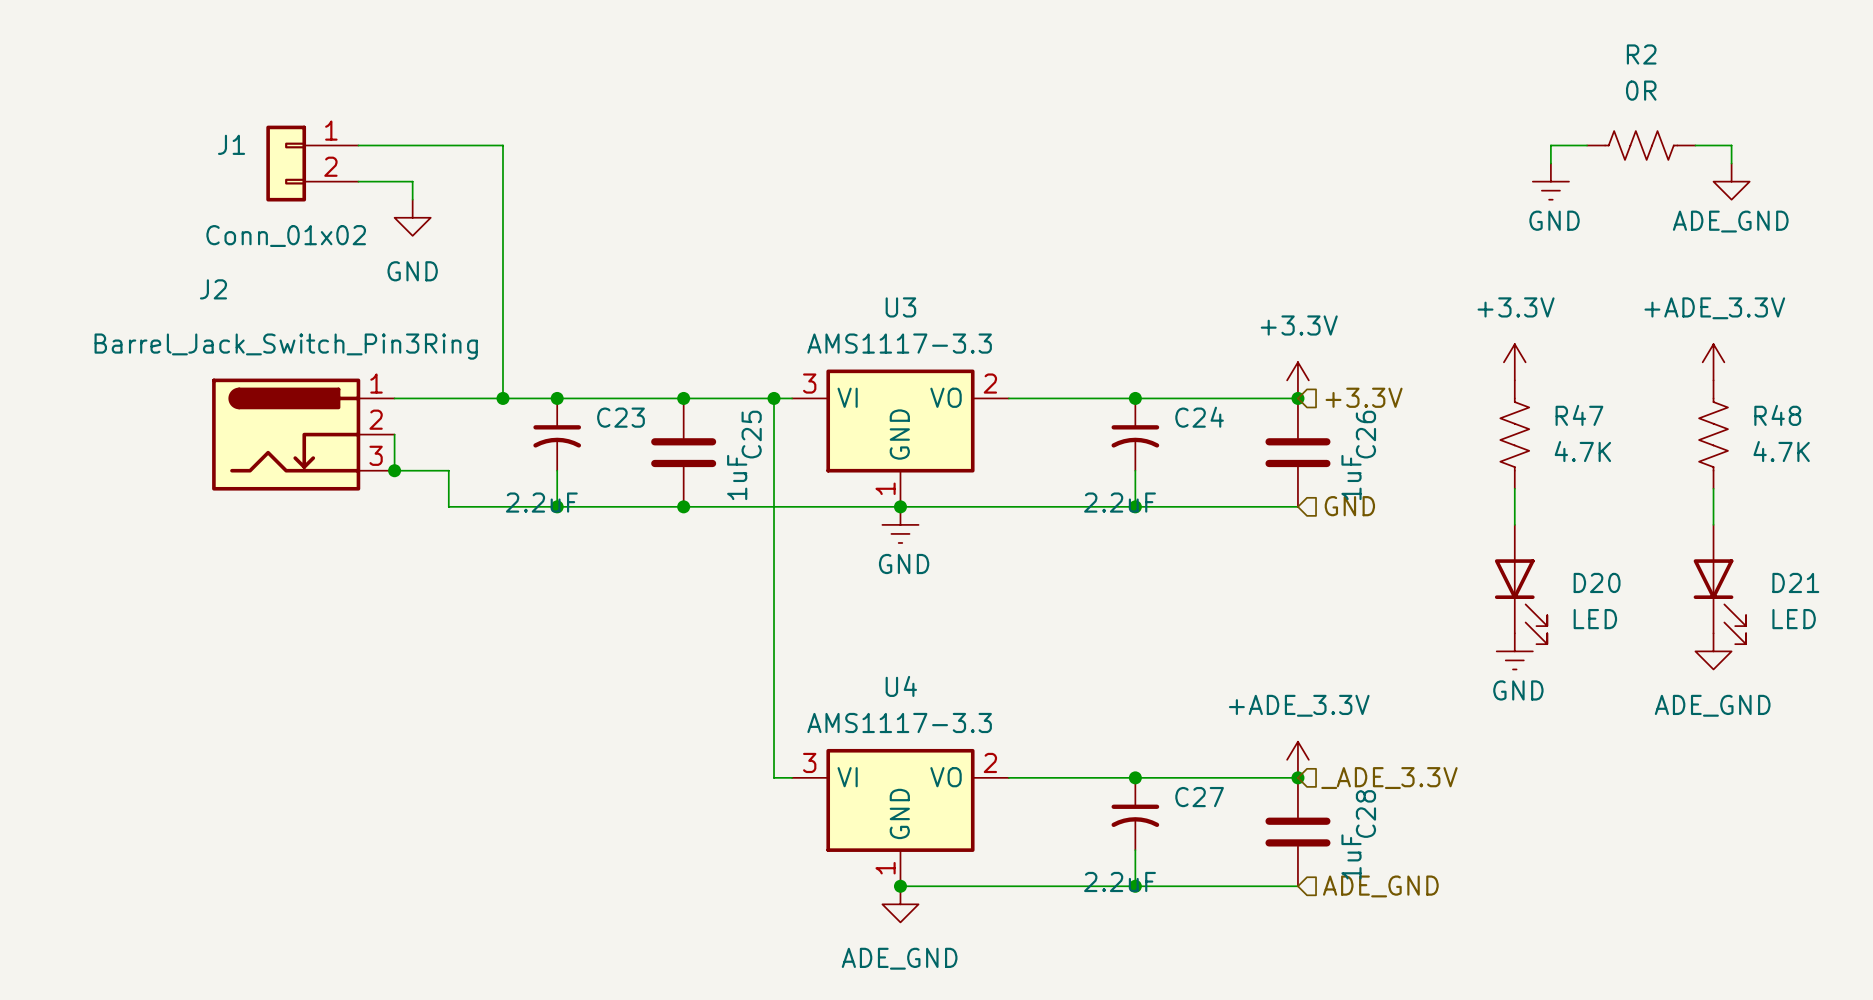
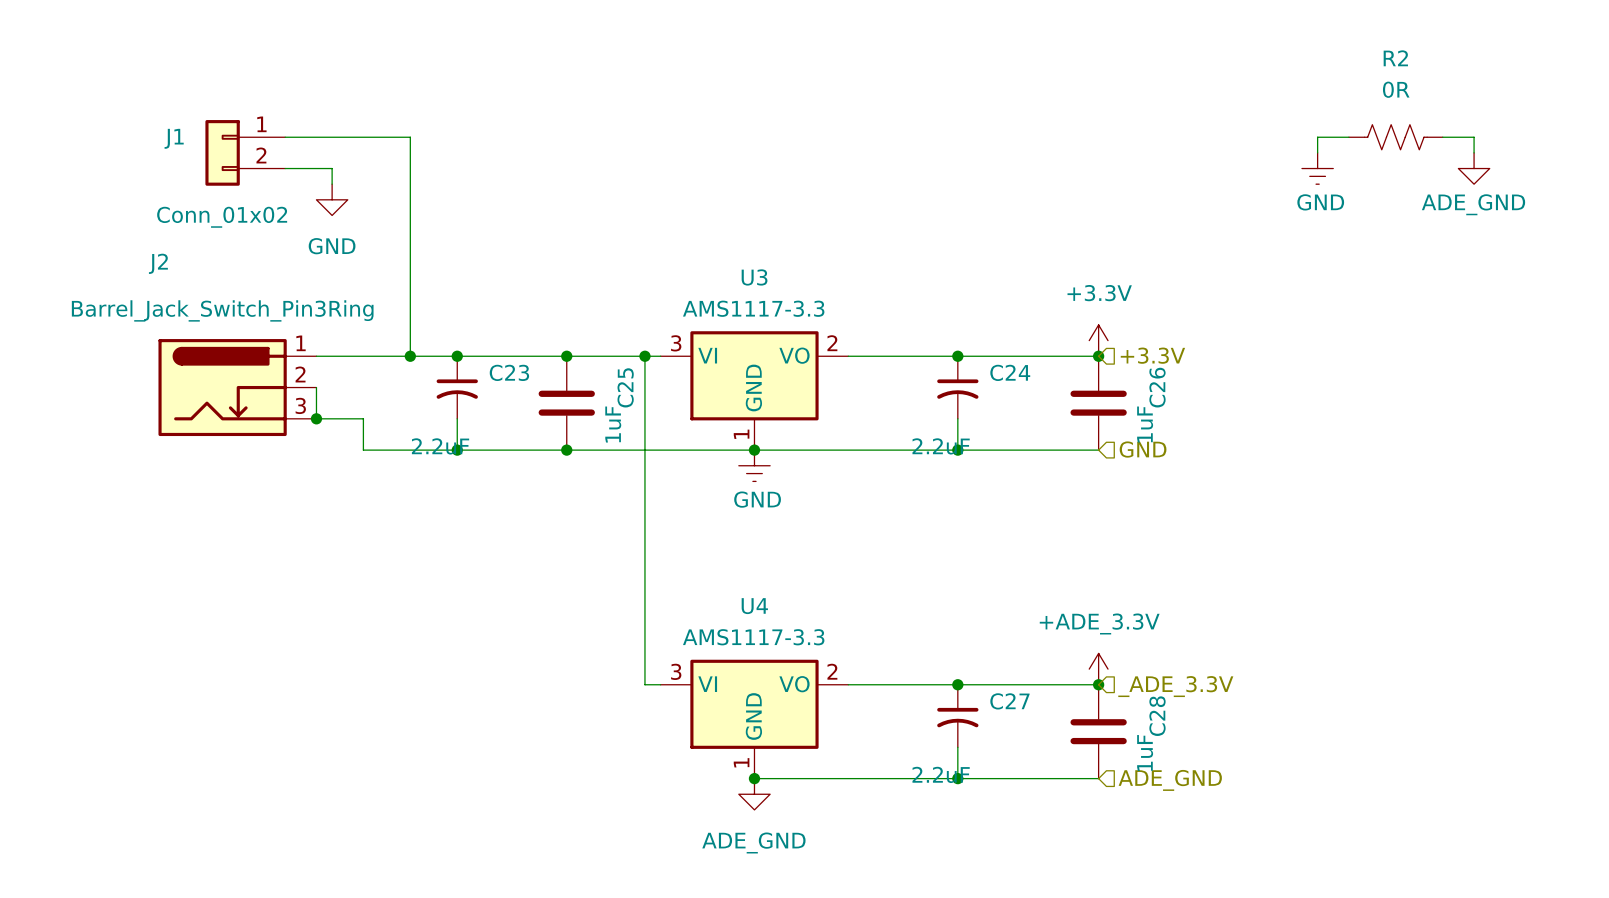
power symbol: +3.3V (1514, 362) -> none
power symbol: +ADE_3.3V (1713, 362) -> none
R47: 4.7K (1514, 434) -> none
R48: 4.7K (1713, 434) -> none
wire: (1514, 488) (1514, 524) -> none
wire: (1713, 488) (1713, 524) -> none
D20: LED (1521, 584) -> none
D21: LED (1719, 584) -> none
power symbol: GND (1514, 651) -> none
power symbol: ADE_GND (1713, 651) -> none

